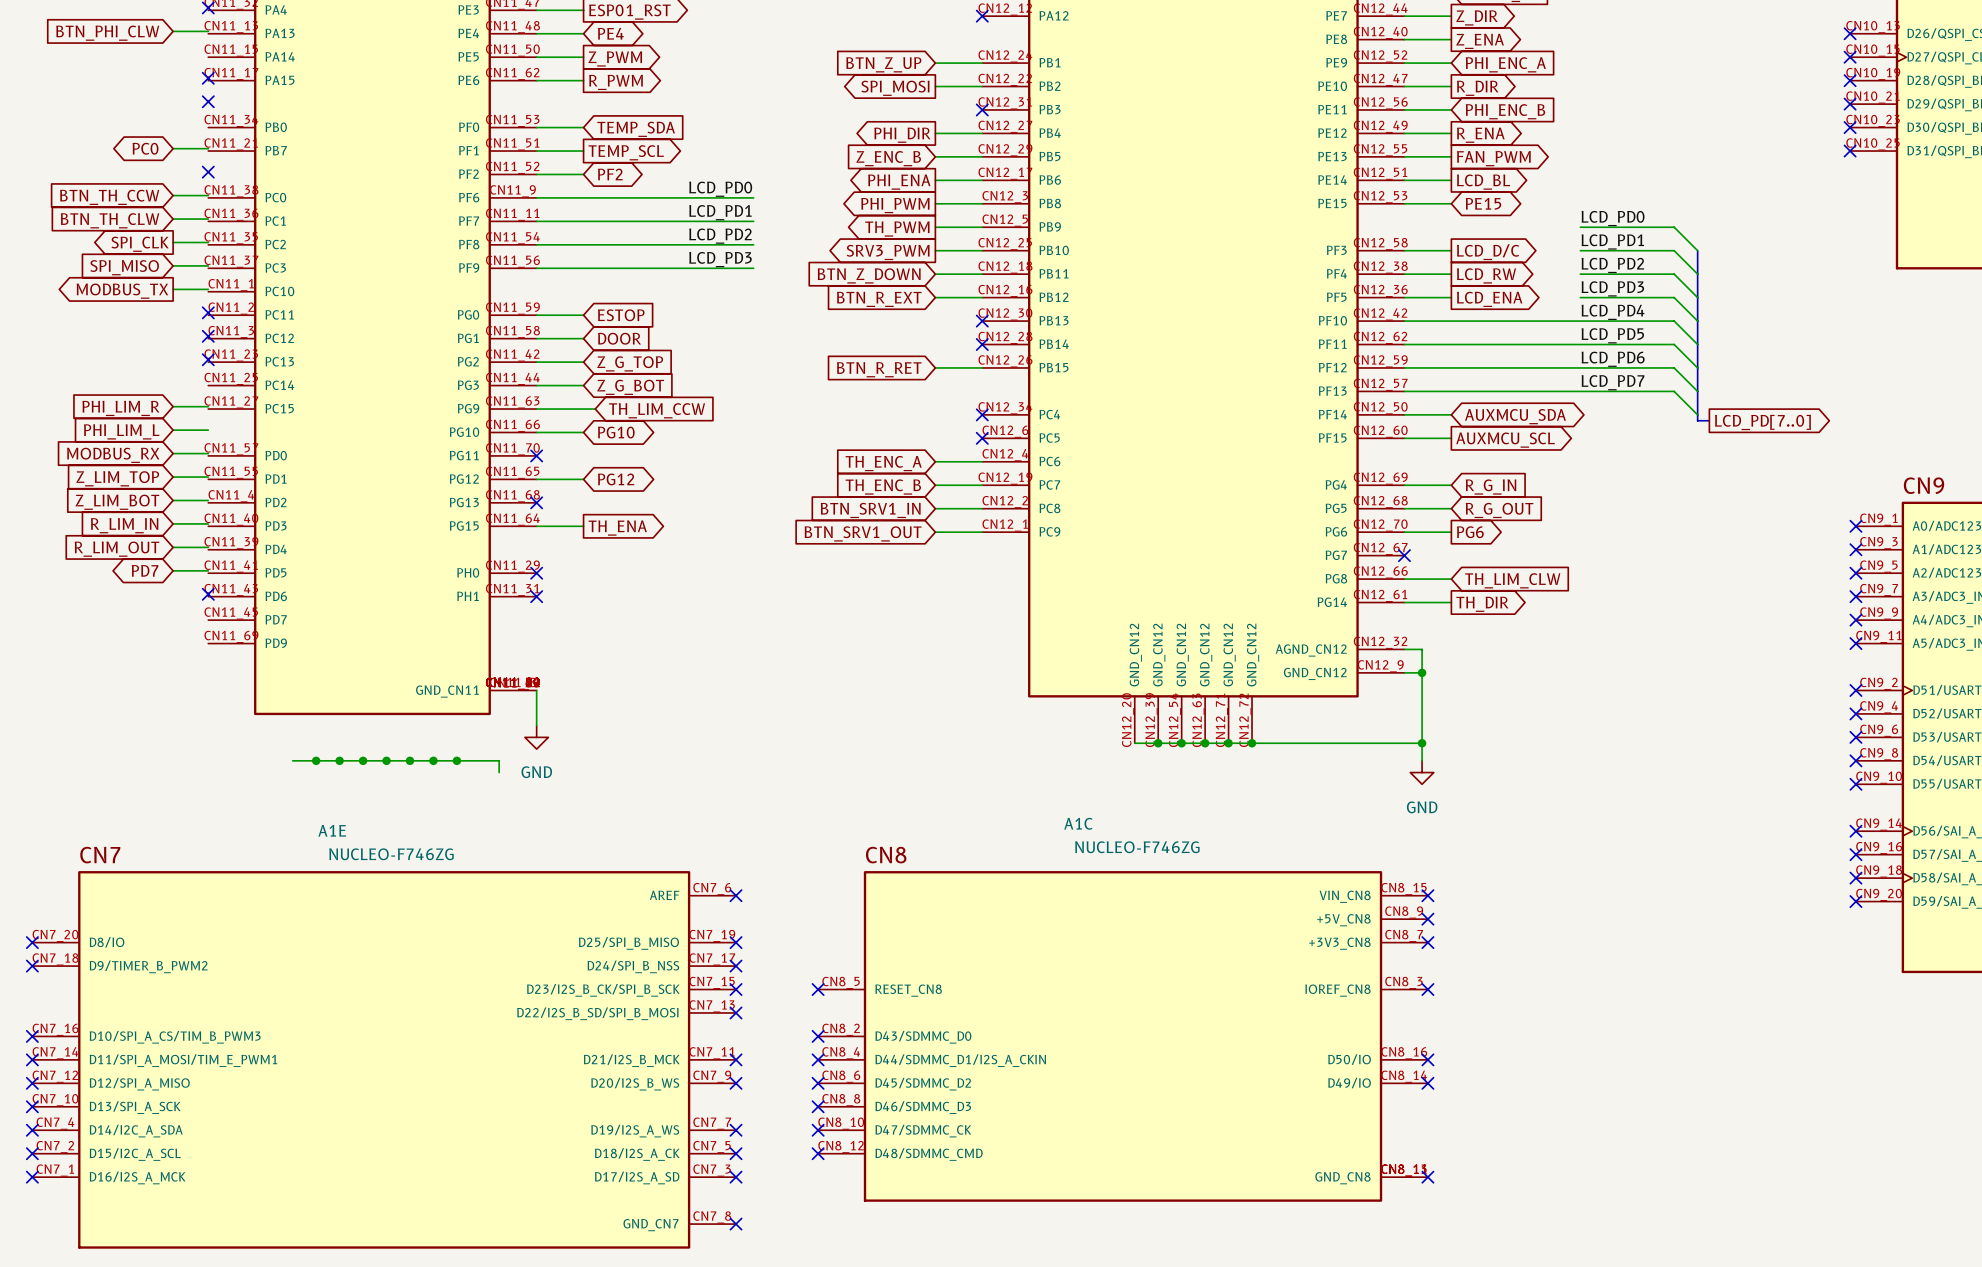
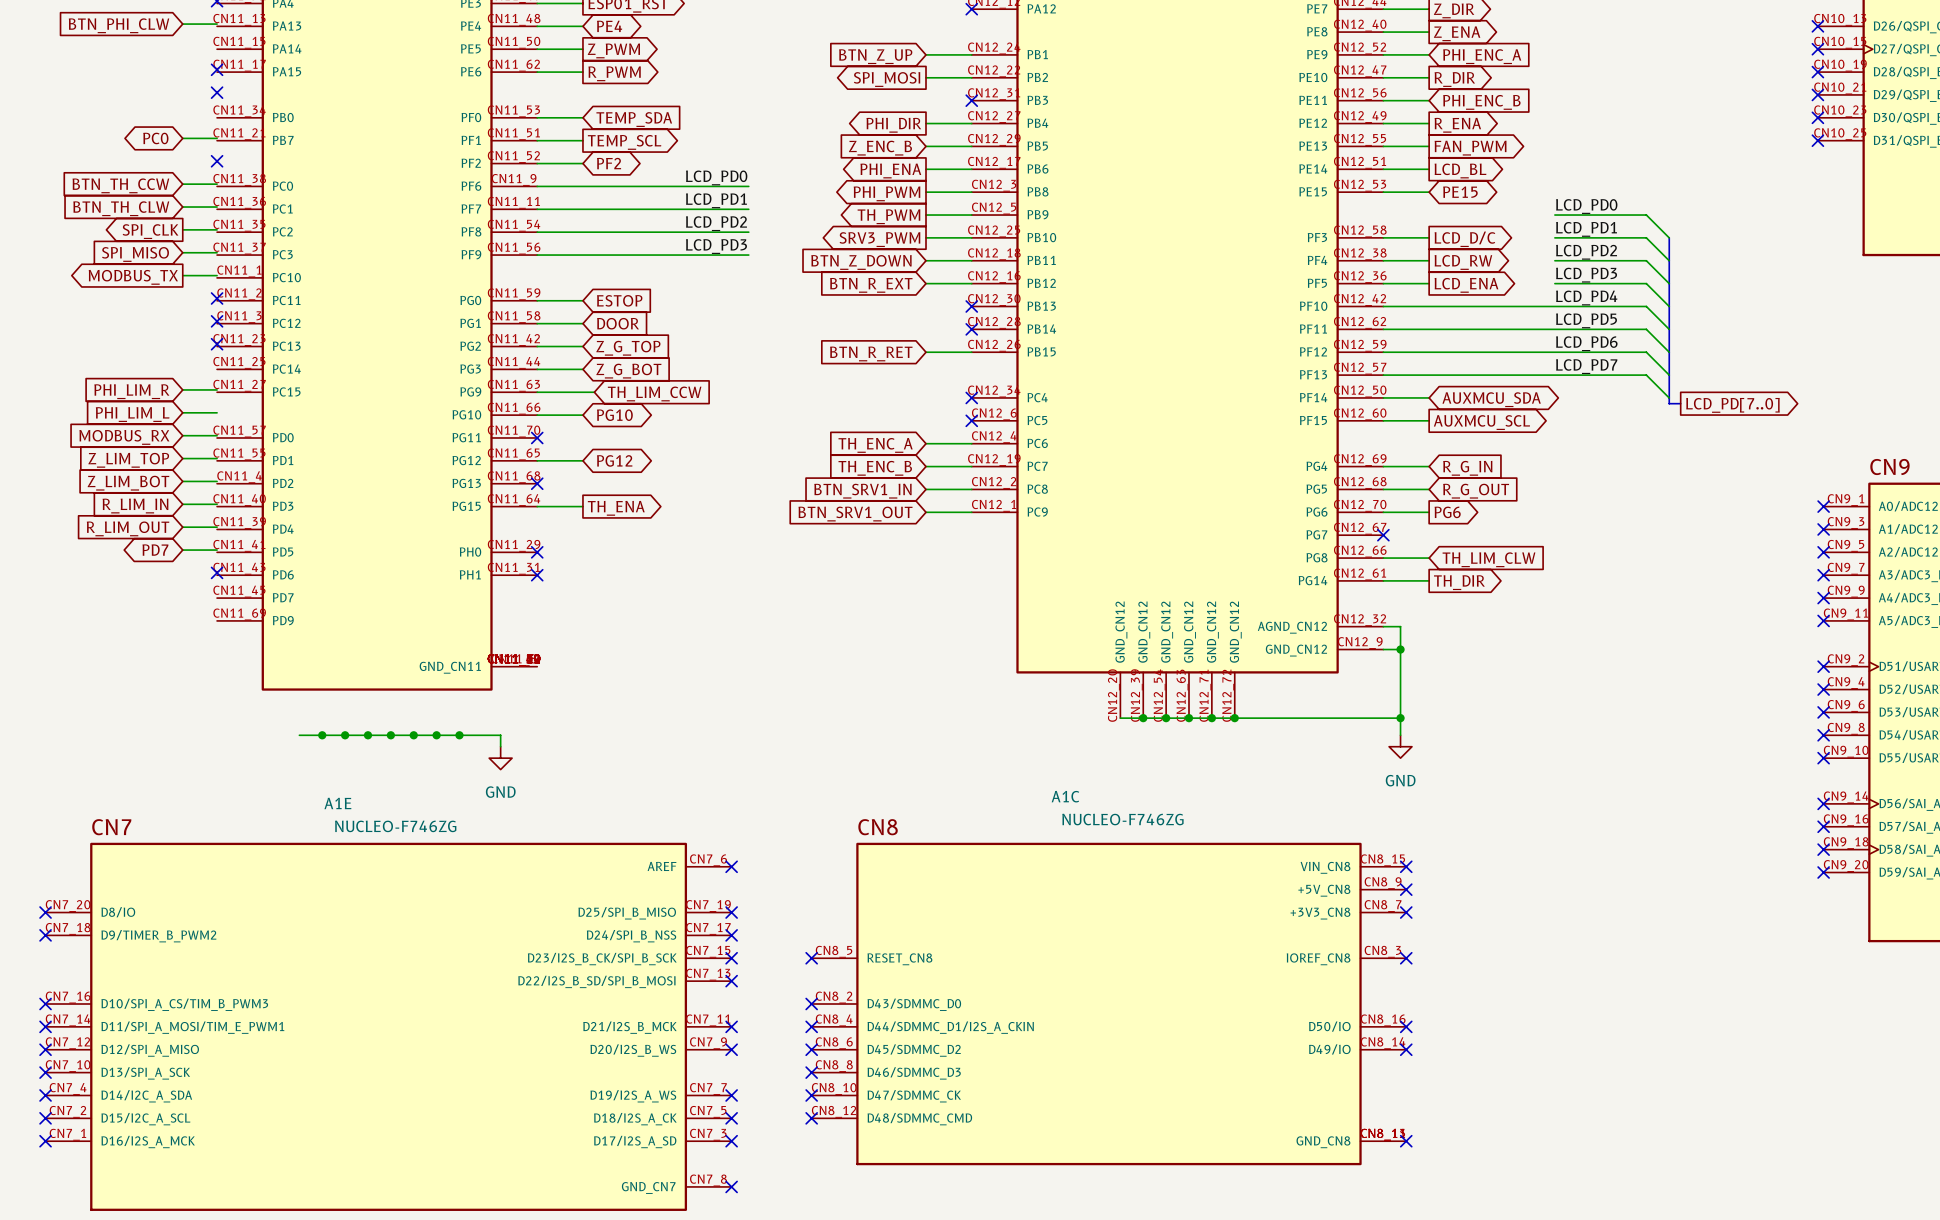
wire: (536, 690) (536, 725) -> none
power symbol position: GND (536, 737) -> GND (500, 758)

